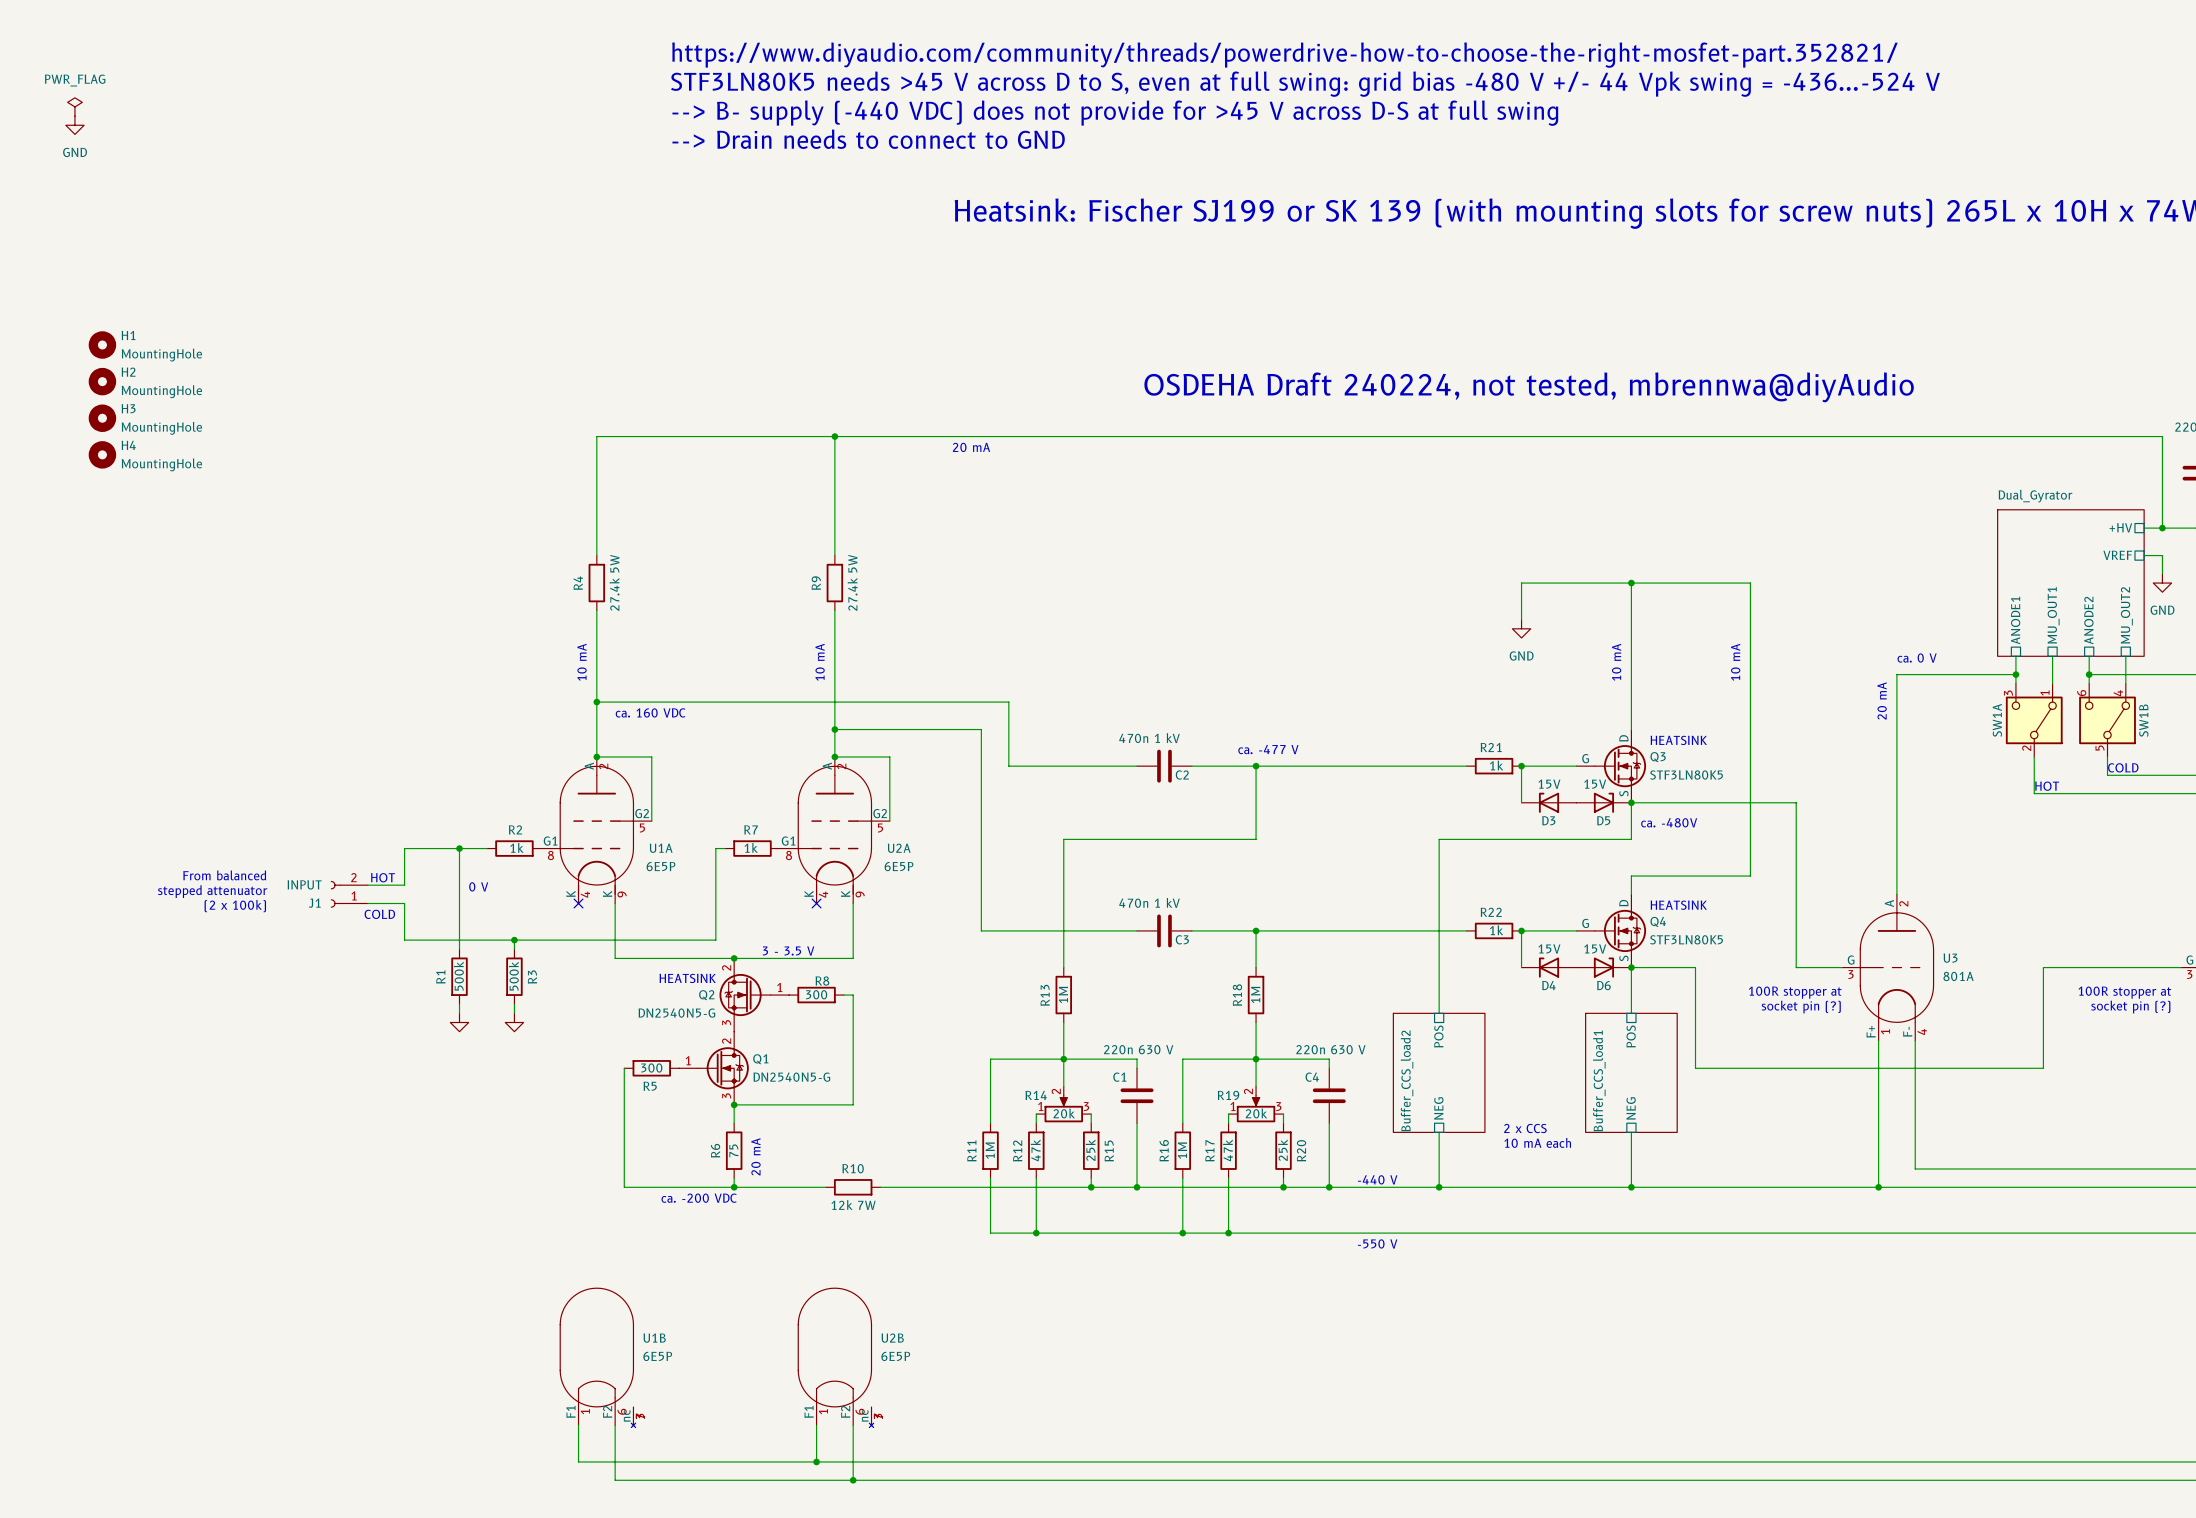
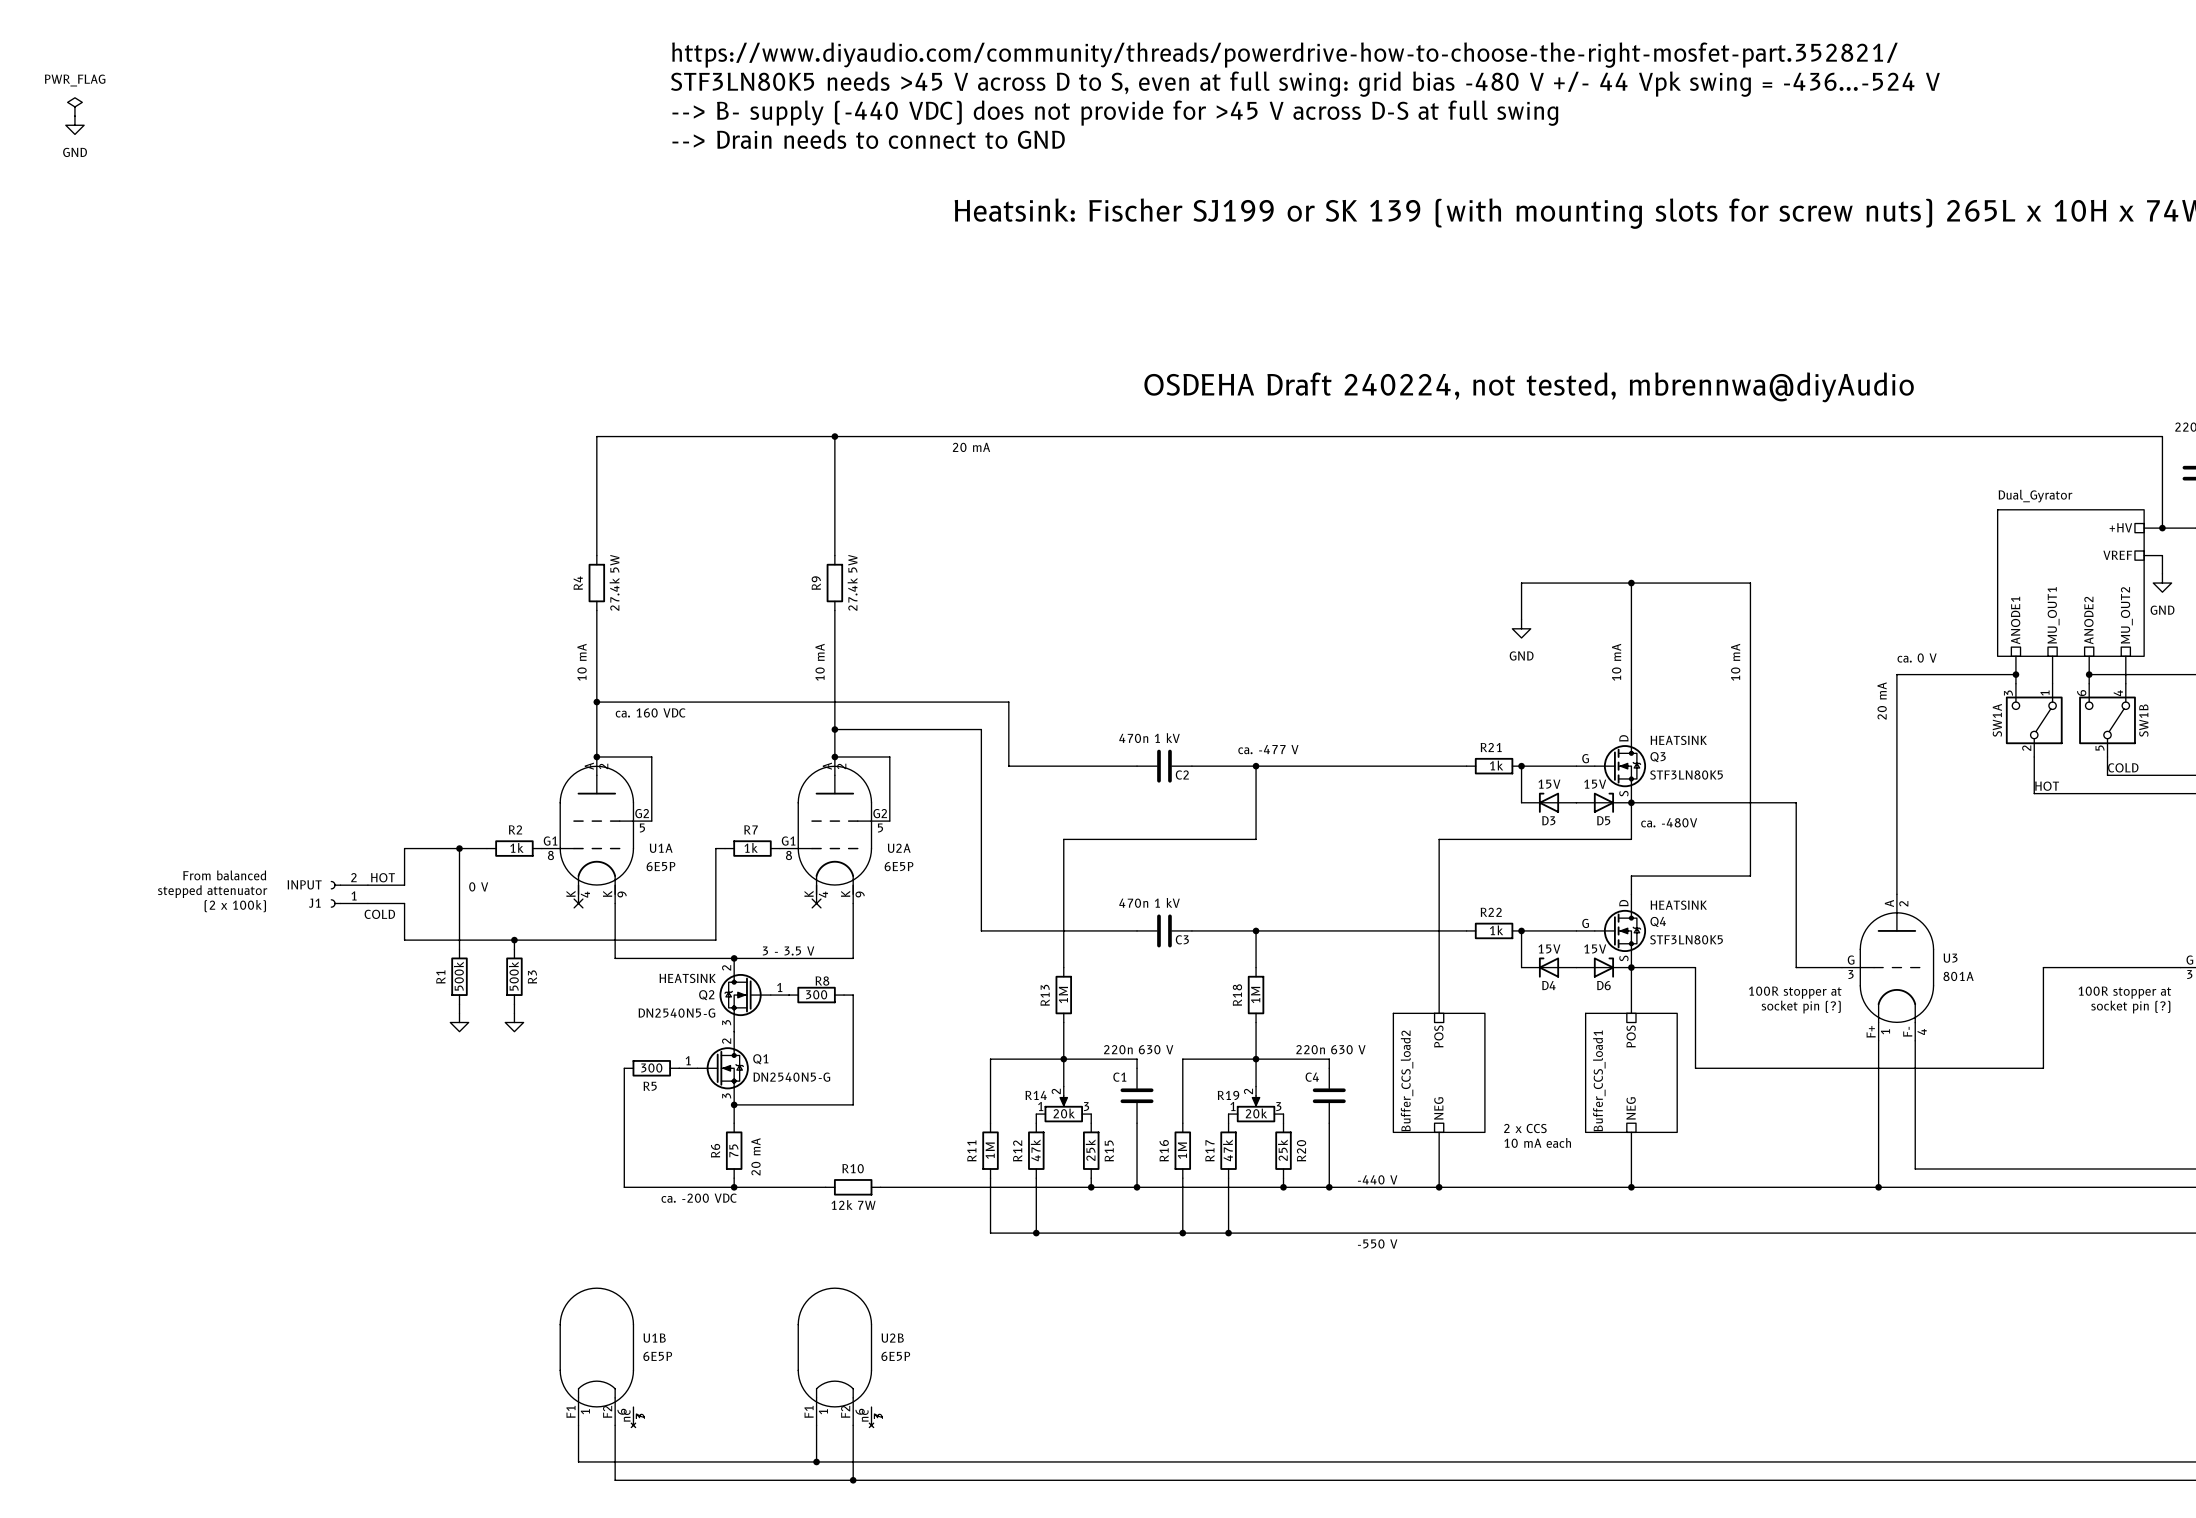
H1: MountingHole (102, 344) -> none
H2: MountingHole (102, 381) -> none
H3: MountingHole (102, 418) -> none
H4: MountingHole (102, 454) -> none

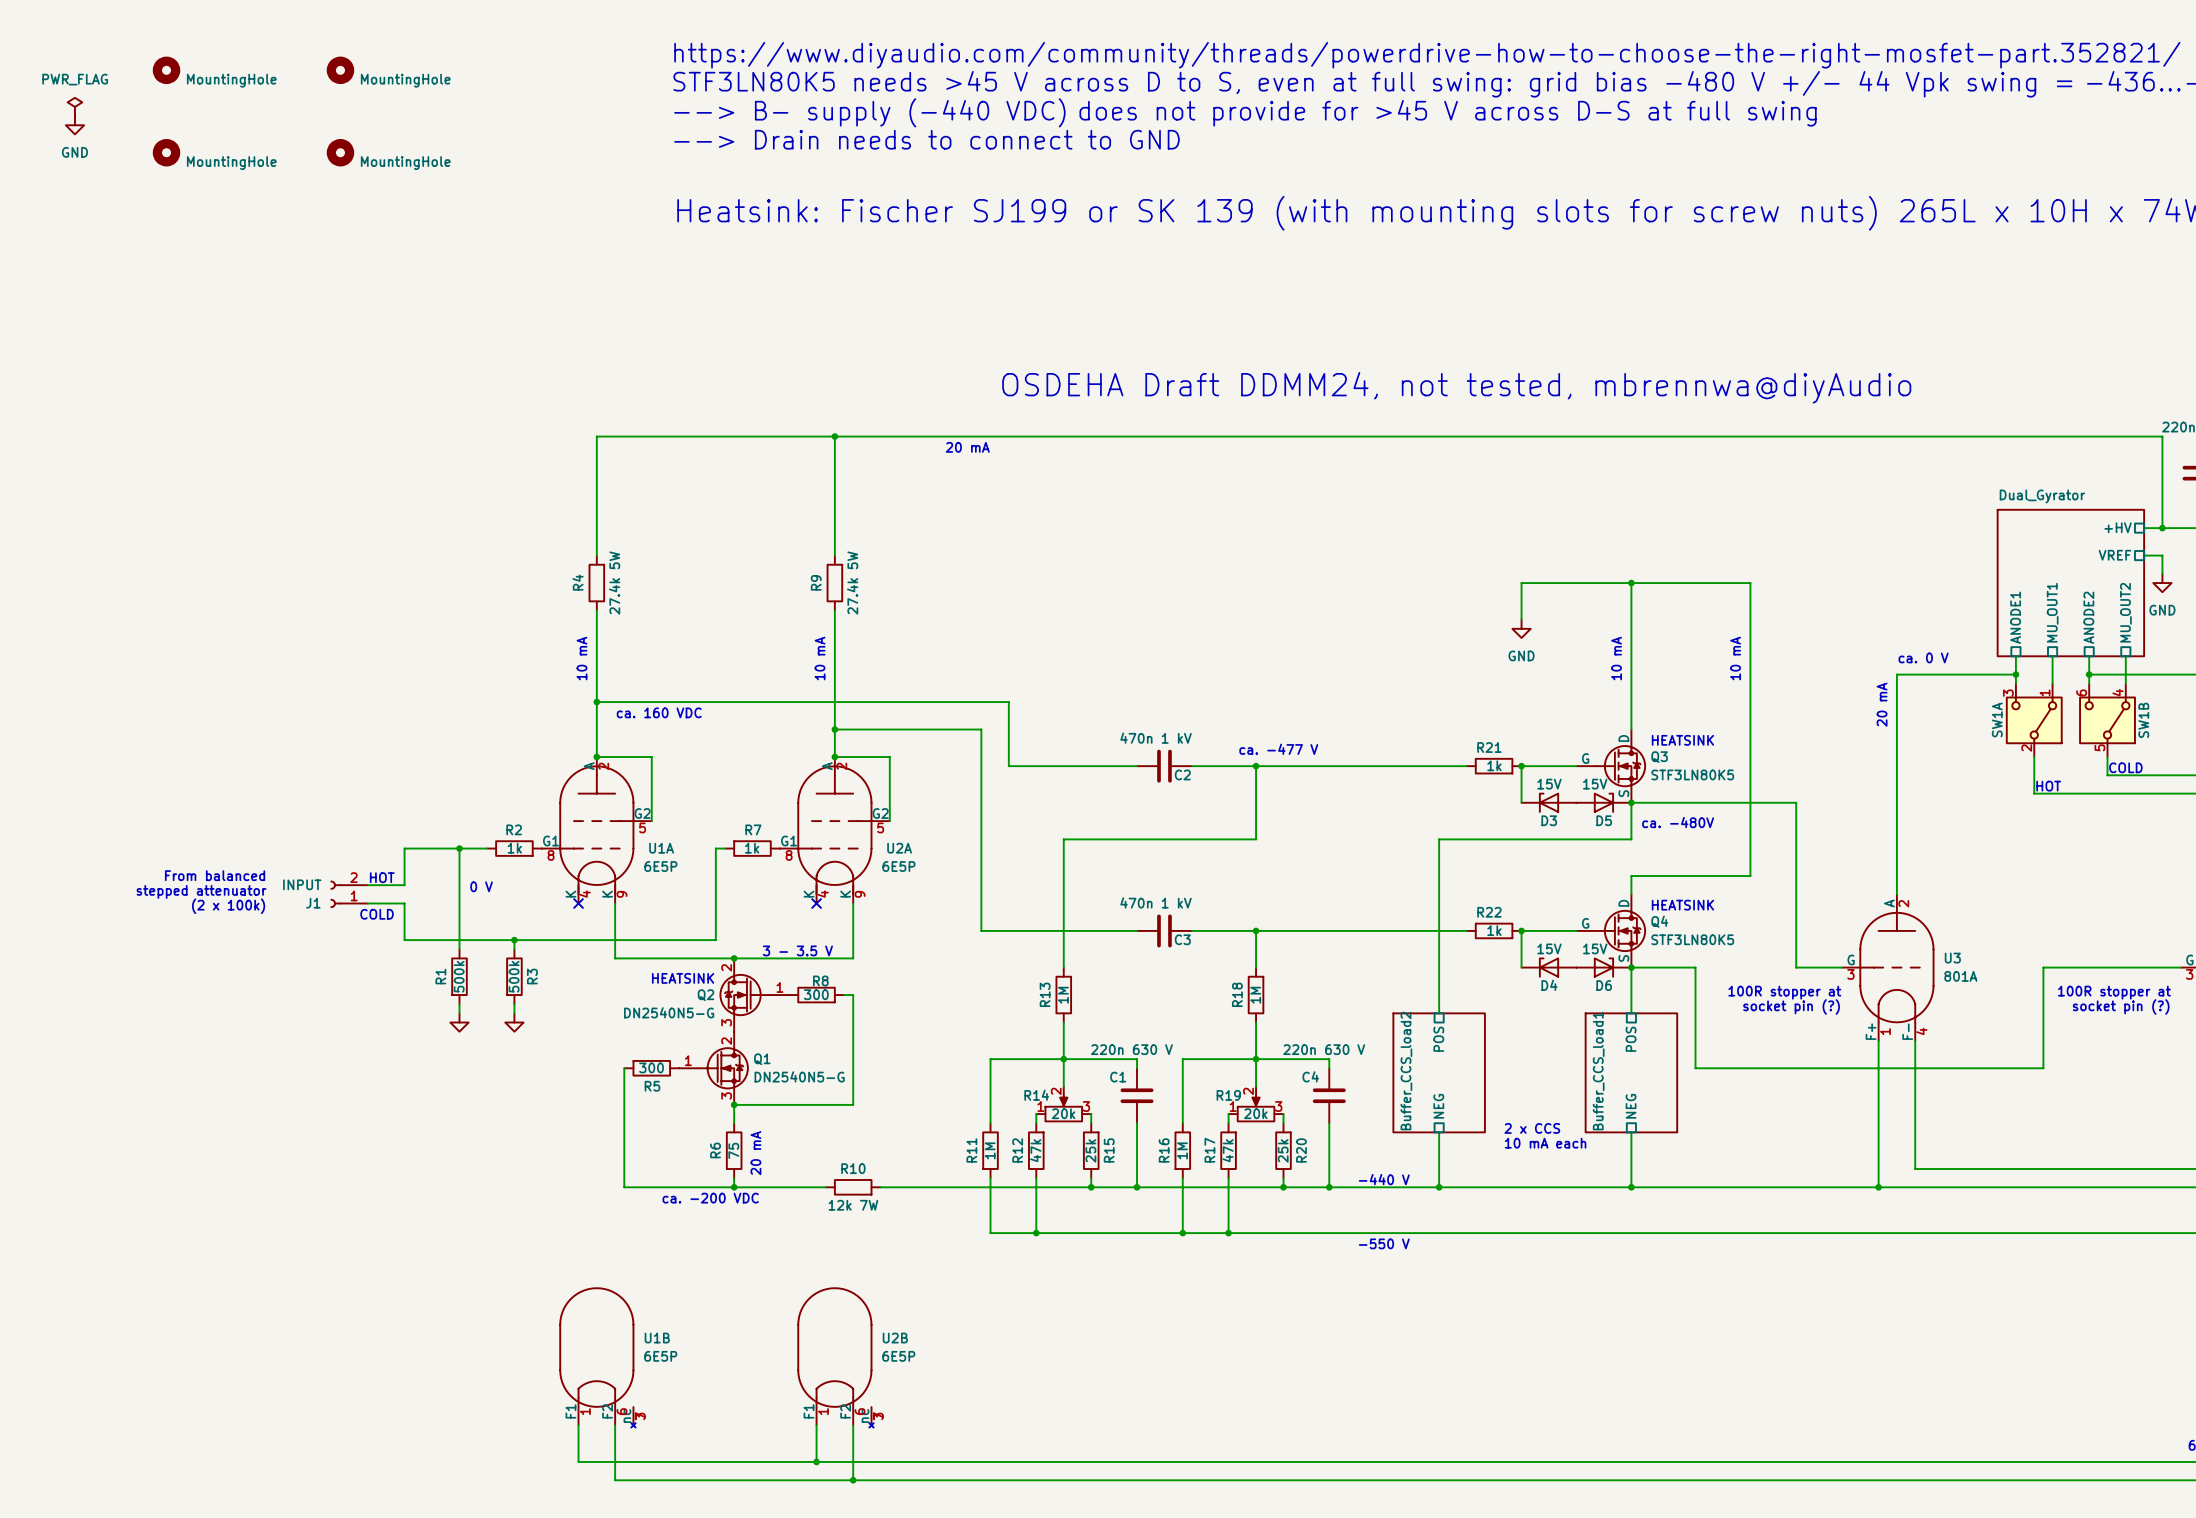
part: none -> MountingHole (166, 70)
part: none -> MountingHole (340, 70)
part: none -> MountingHole (166, 152)
part: none -> MountingHole (340, 152)
text: OSDEHA Draft 240224, not tested, mbrennwa@diyAudio (1529, 387) -> OSDEHA Draft DDMM24, not tested, mbrennwa@diyAudio (1456, 387)

